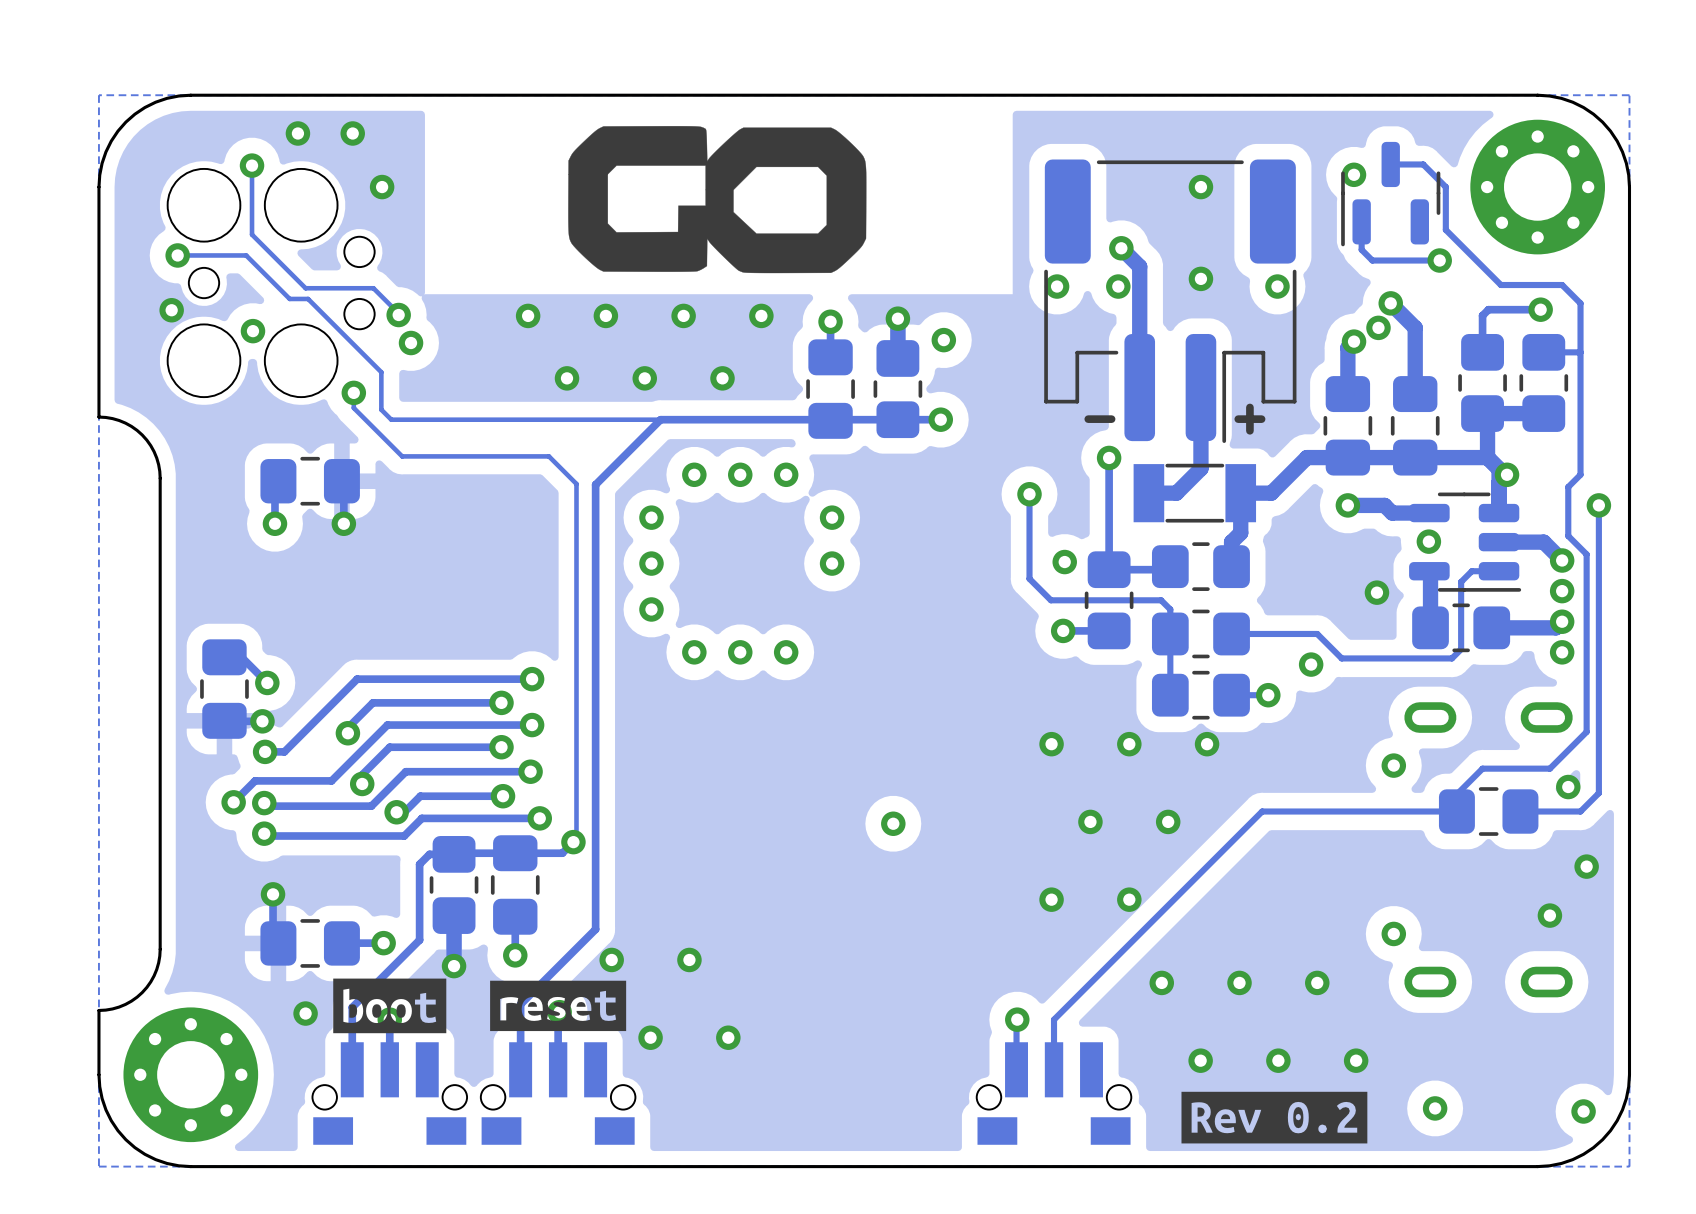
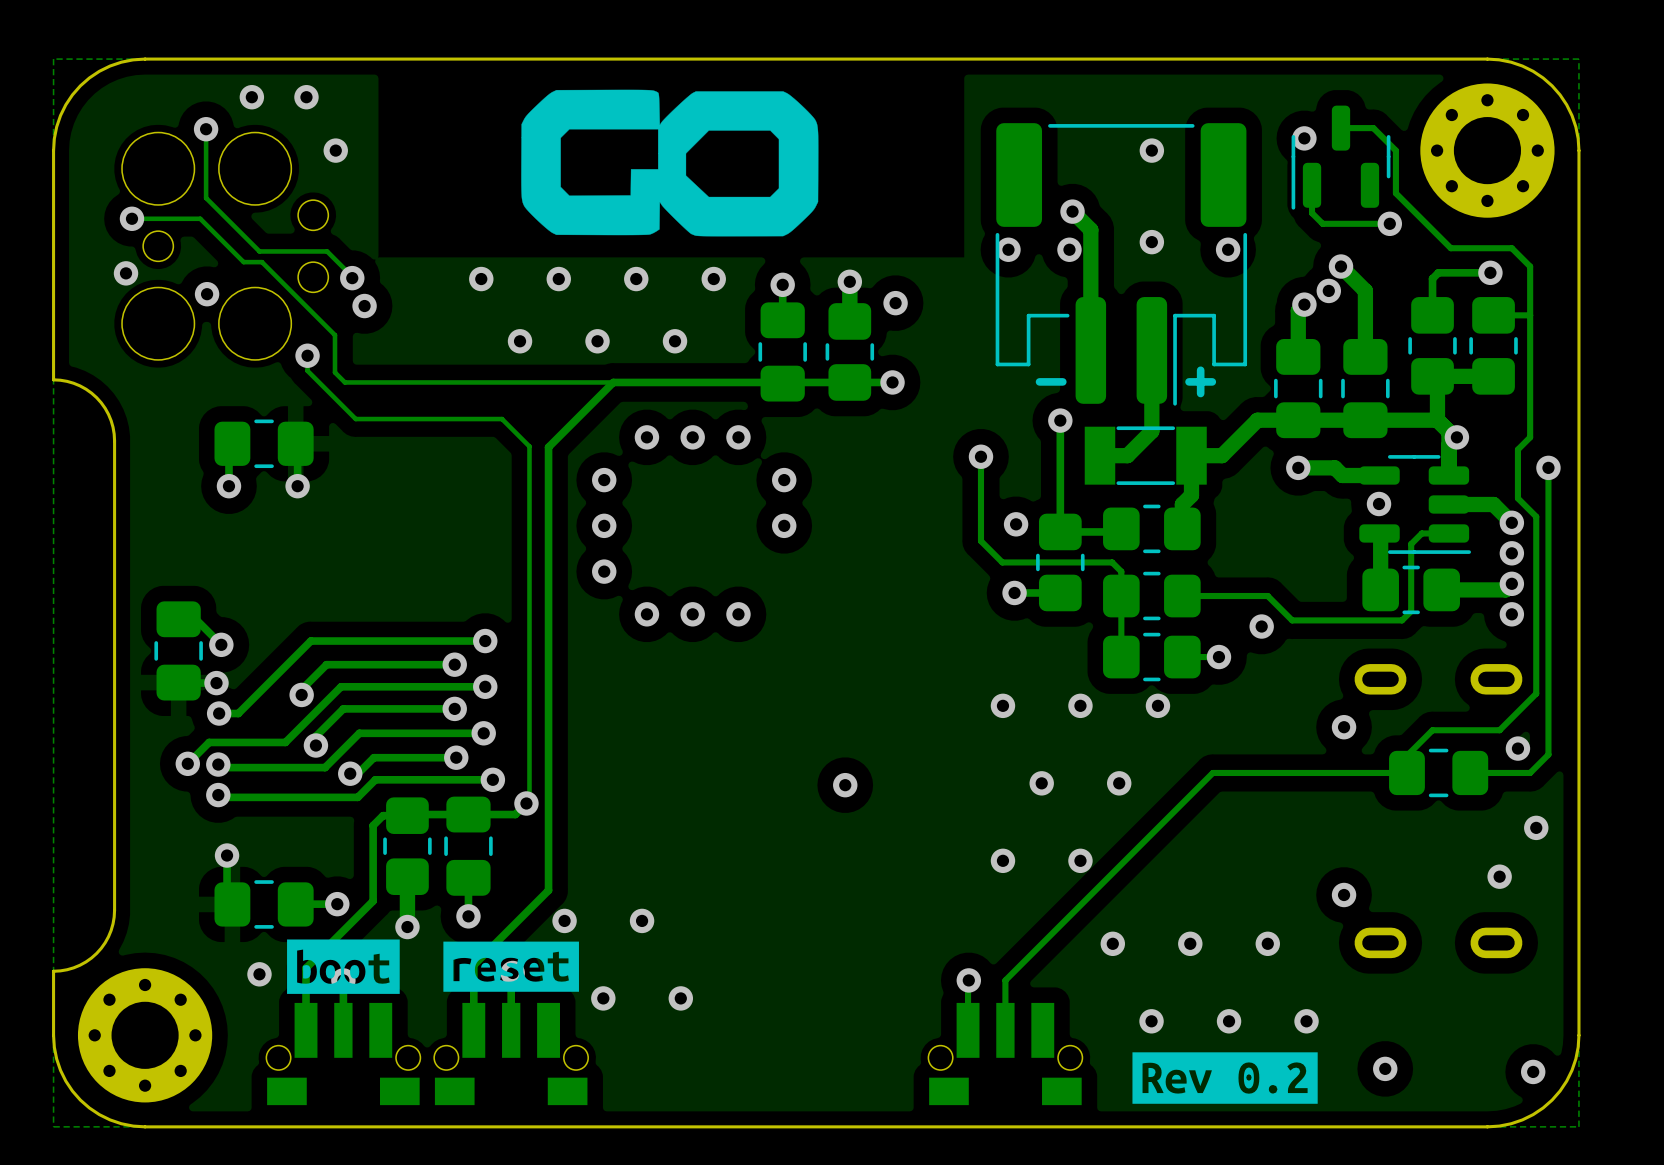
via: (1376, 592) -> none

